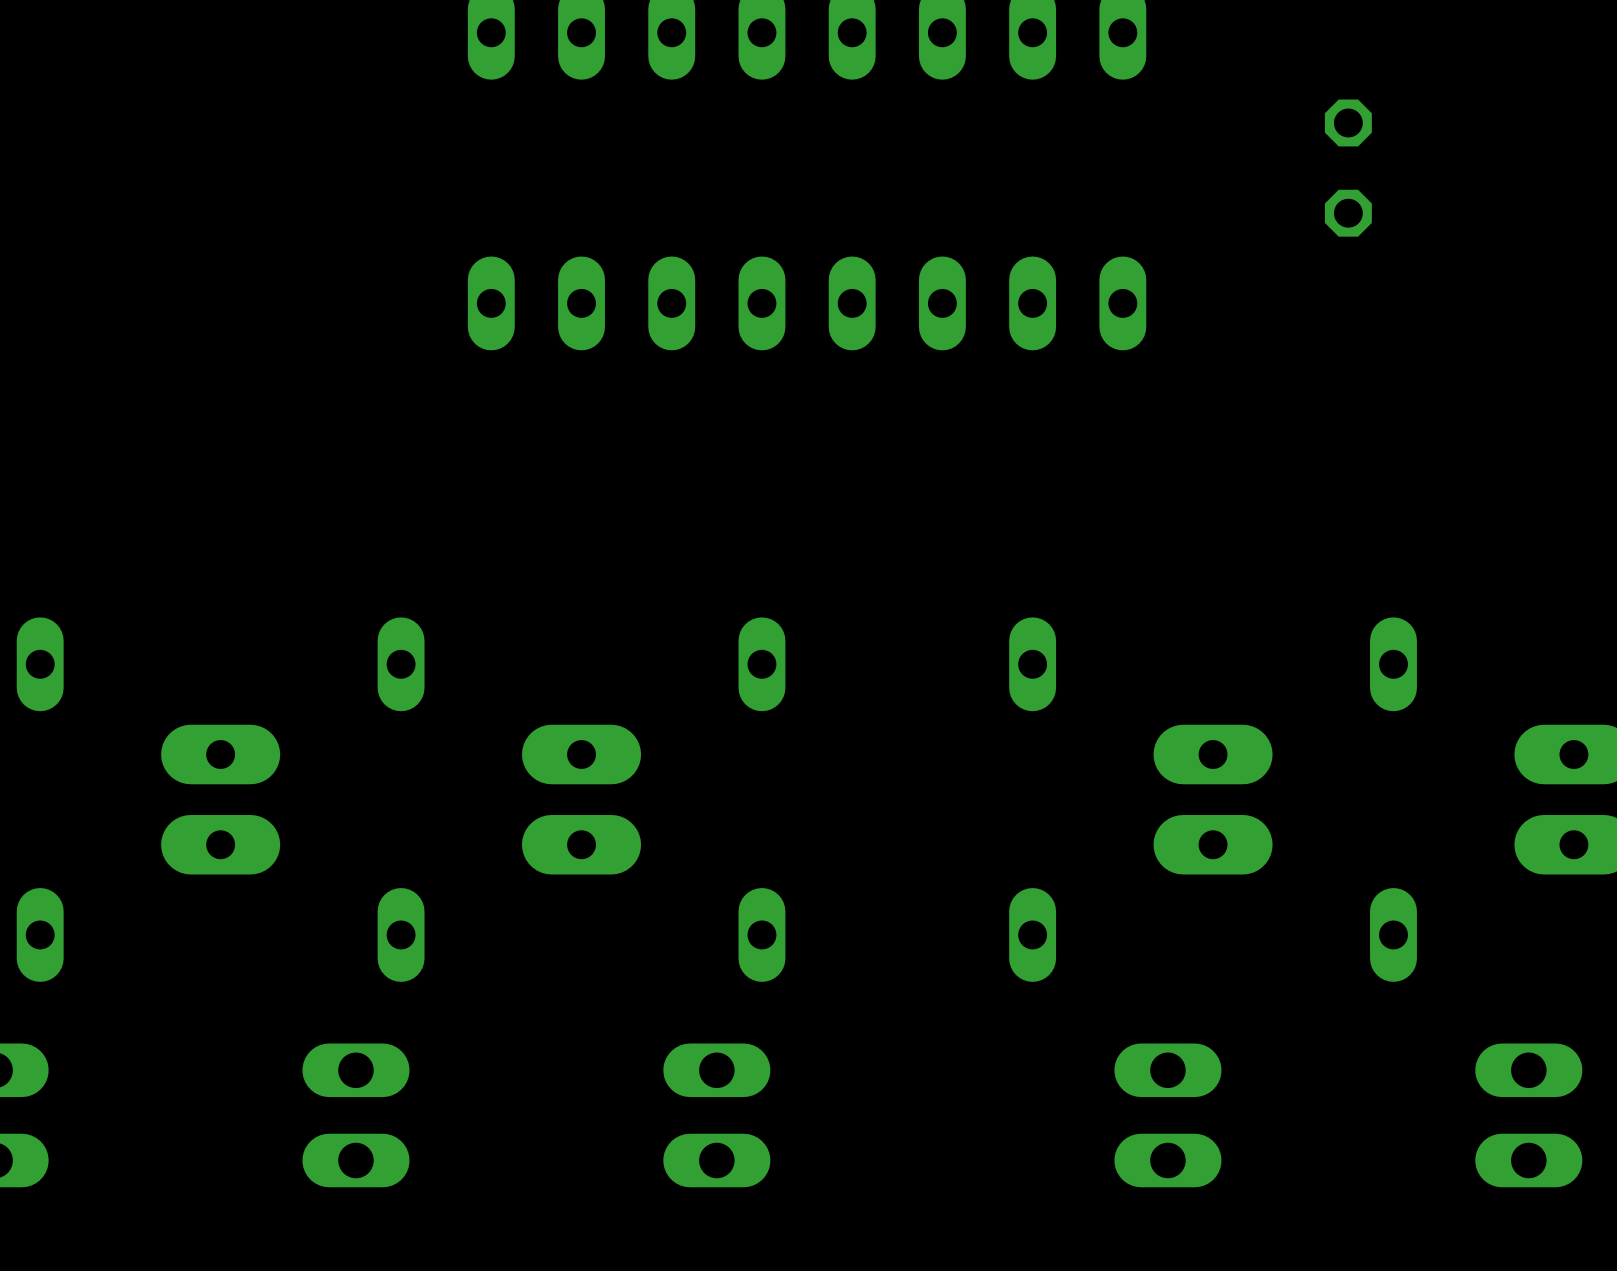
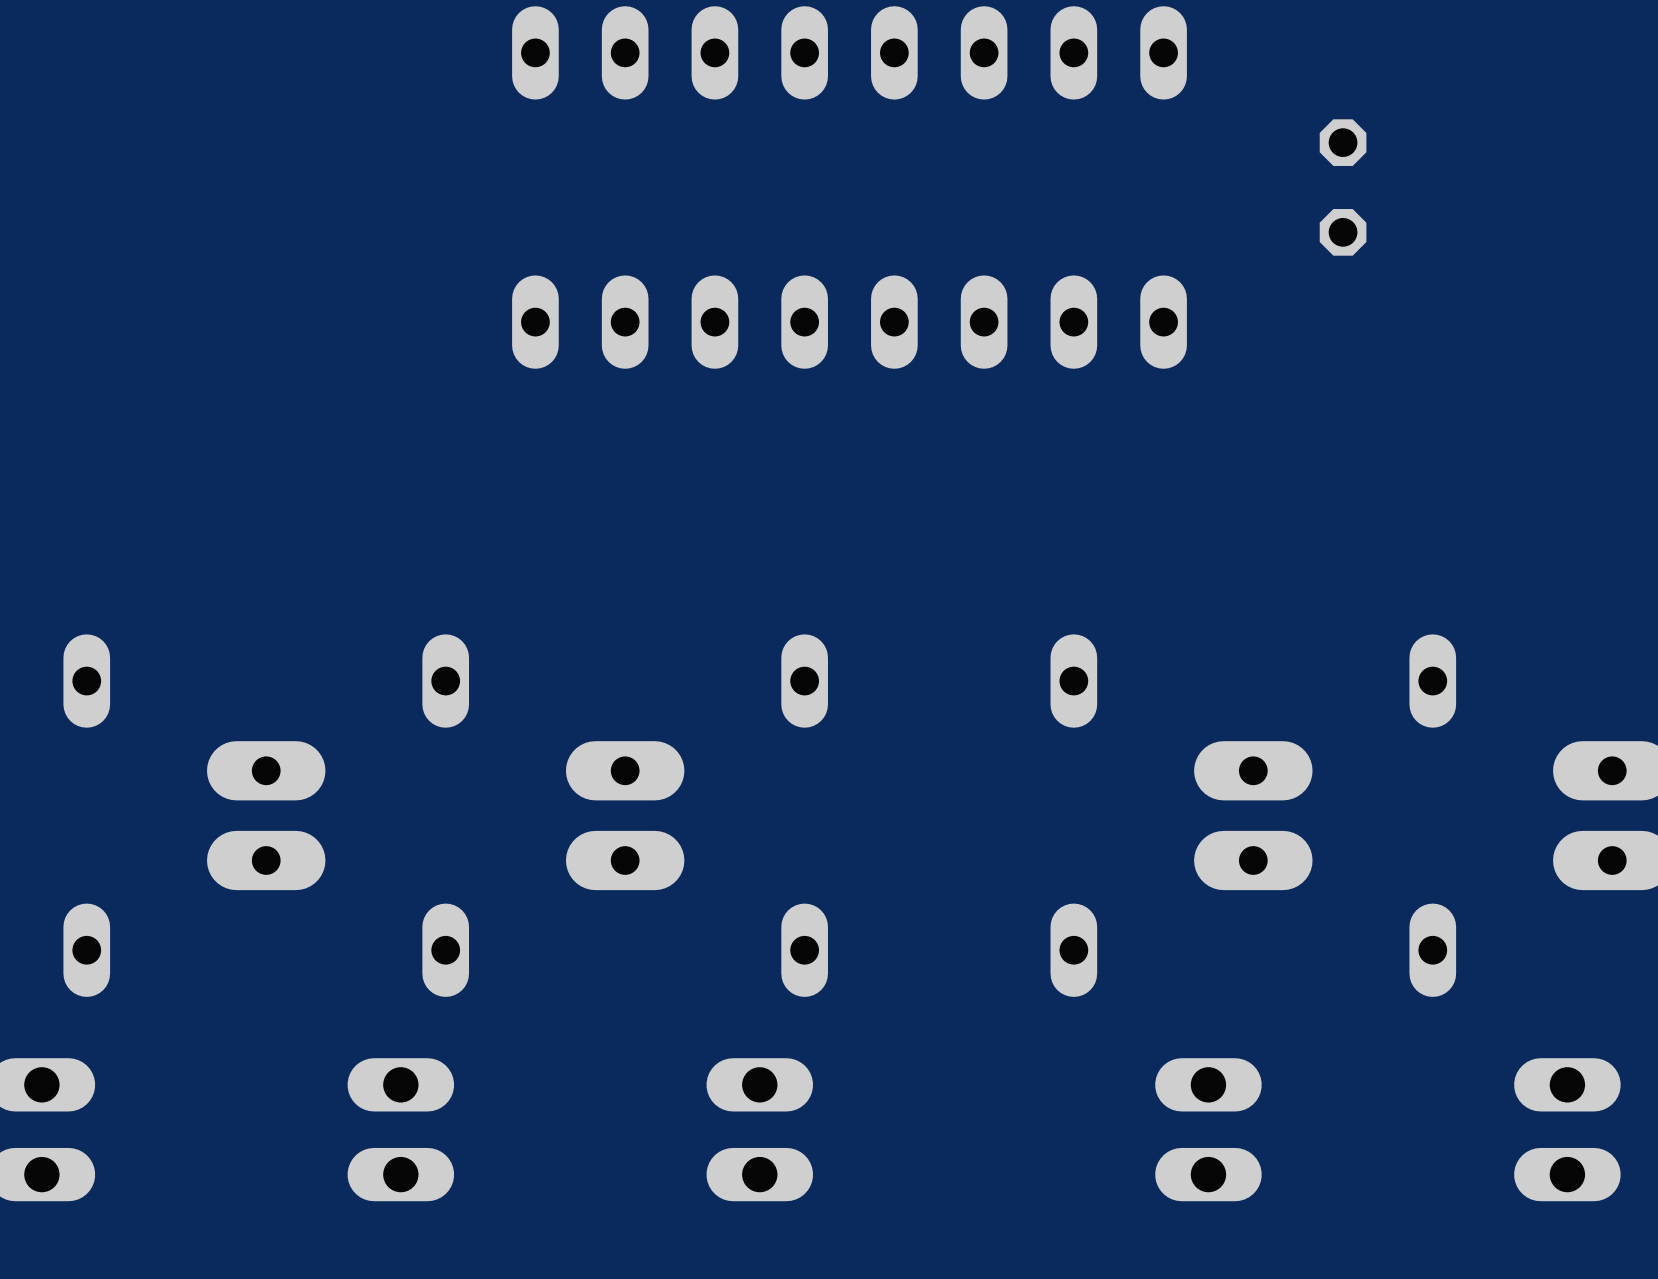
part position: (1348, 168) -> (1343, 187)

